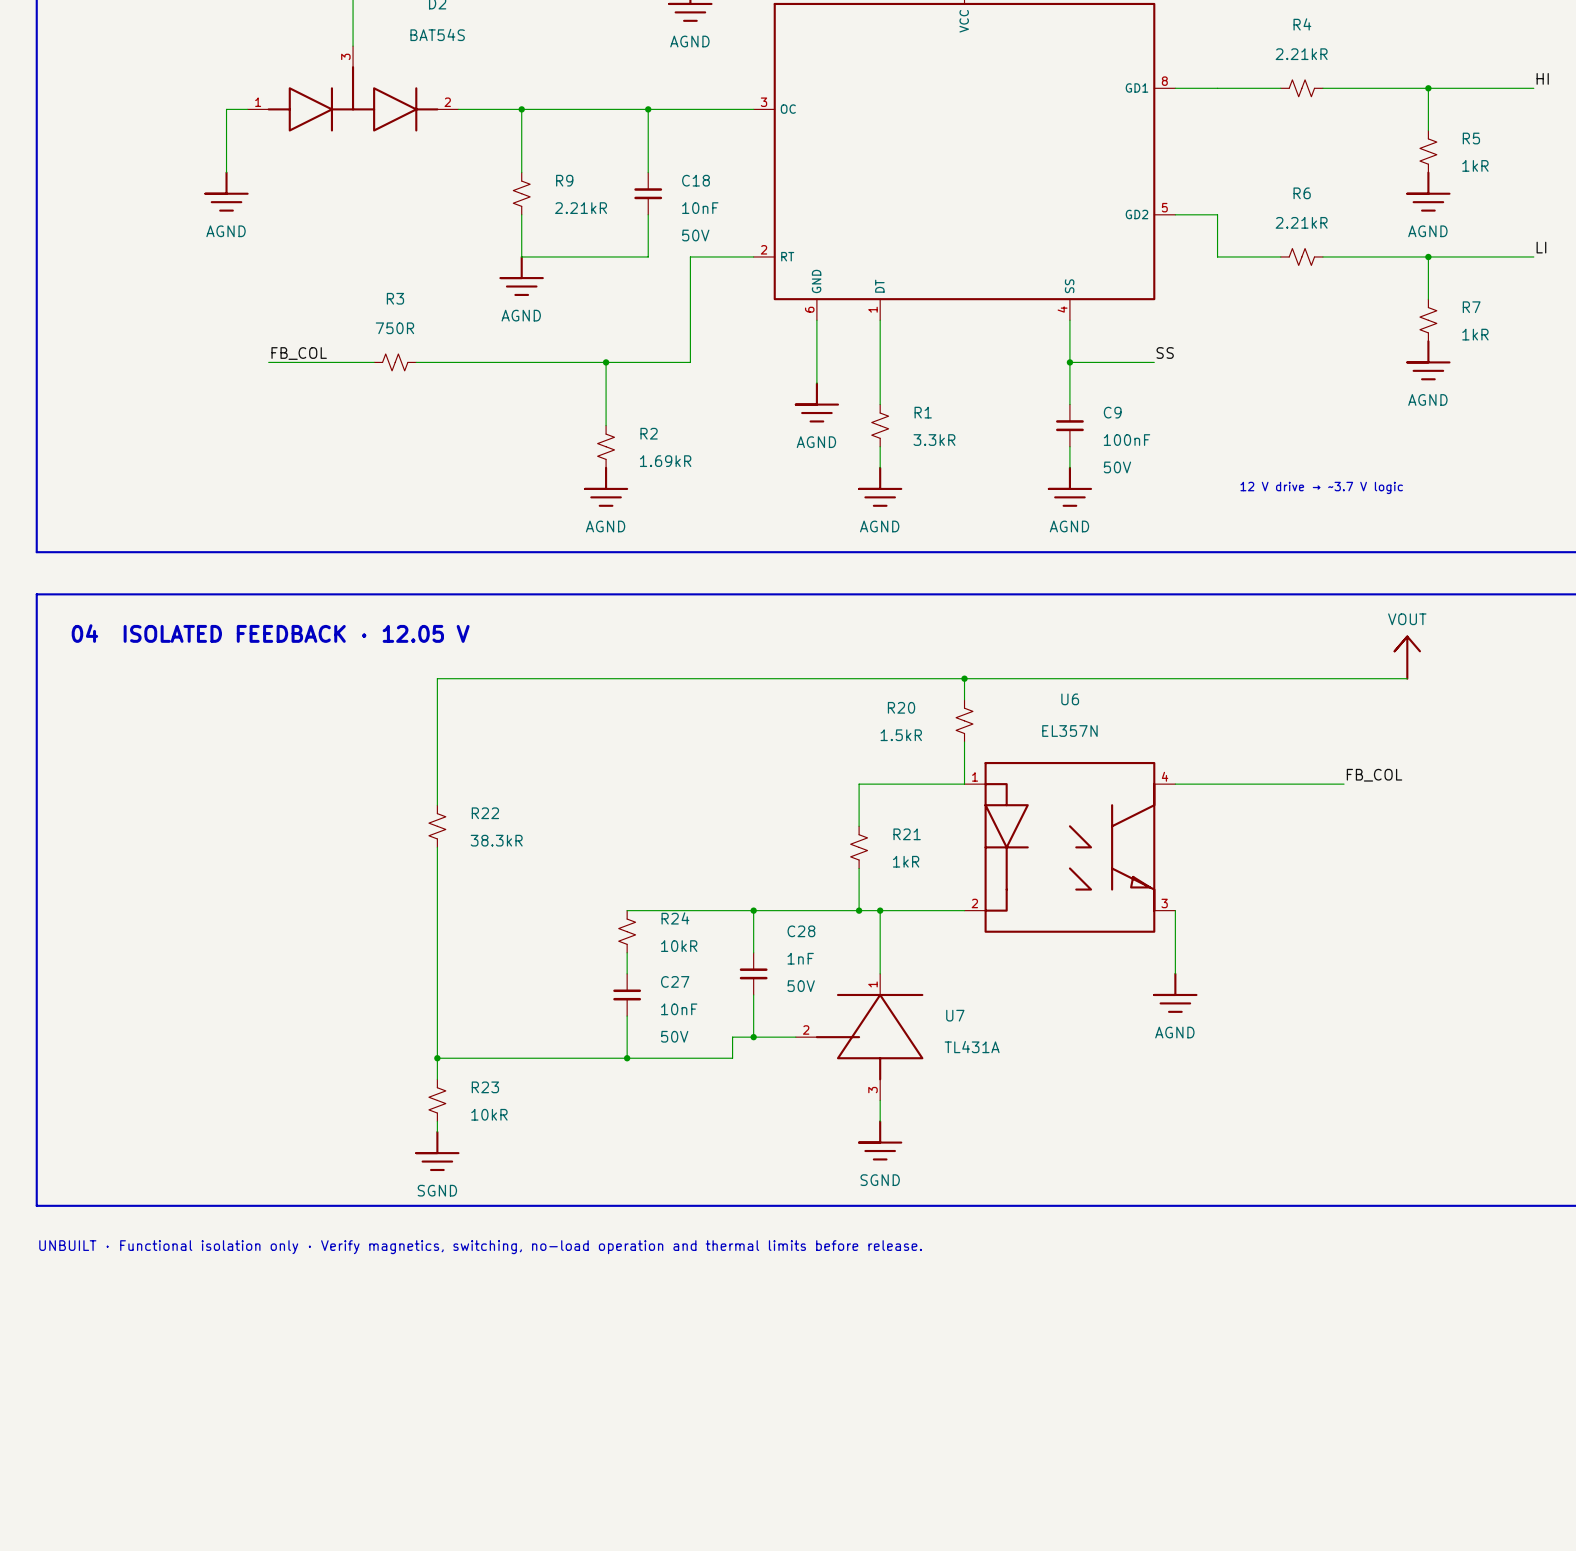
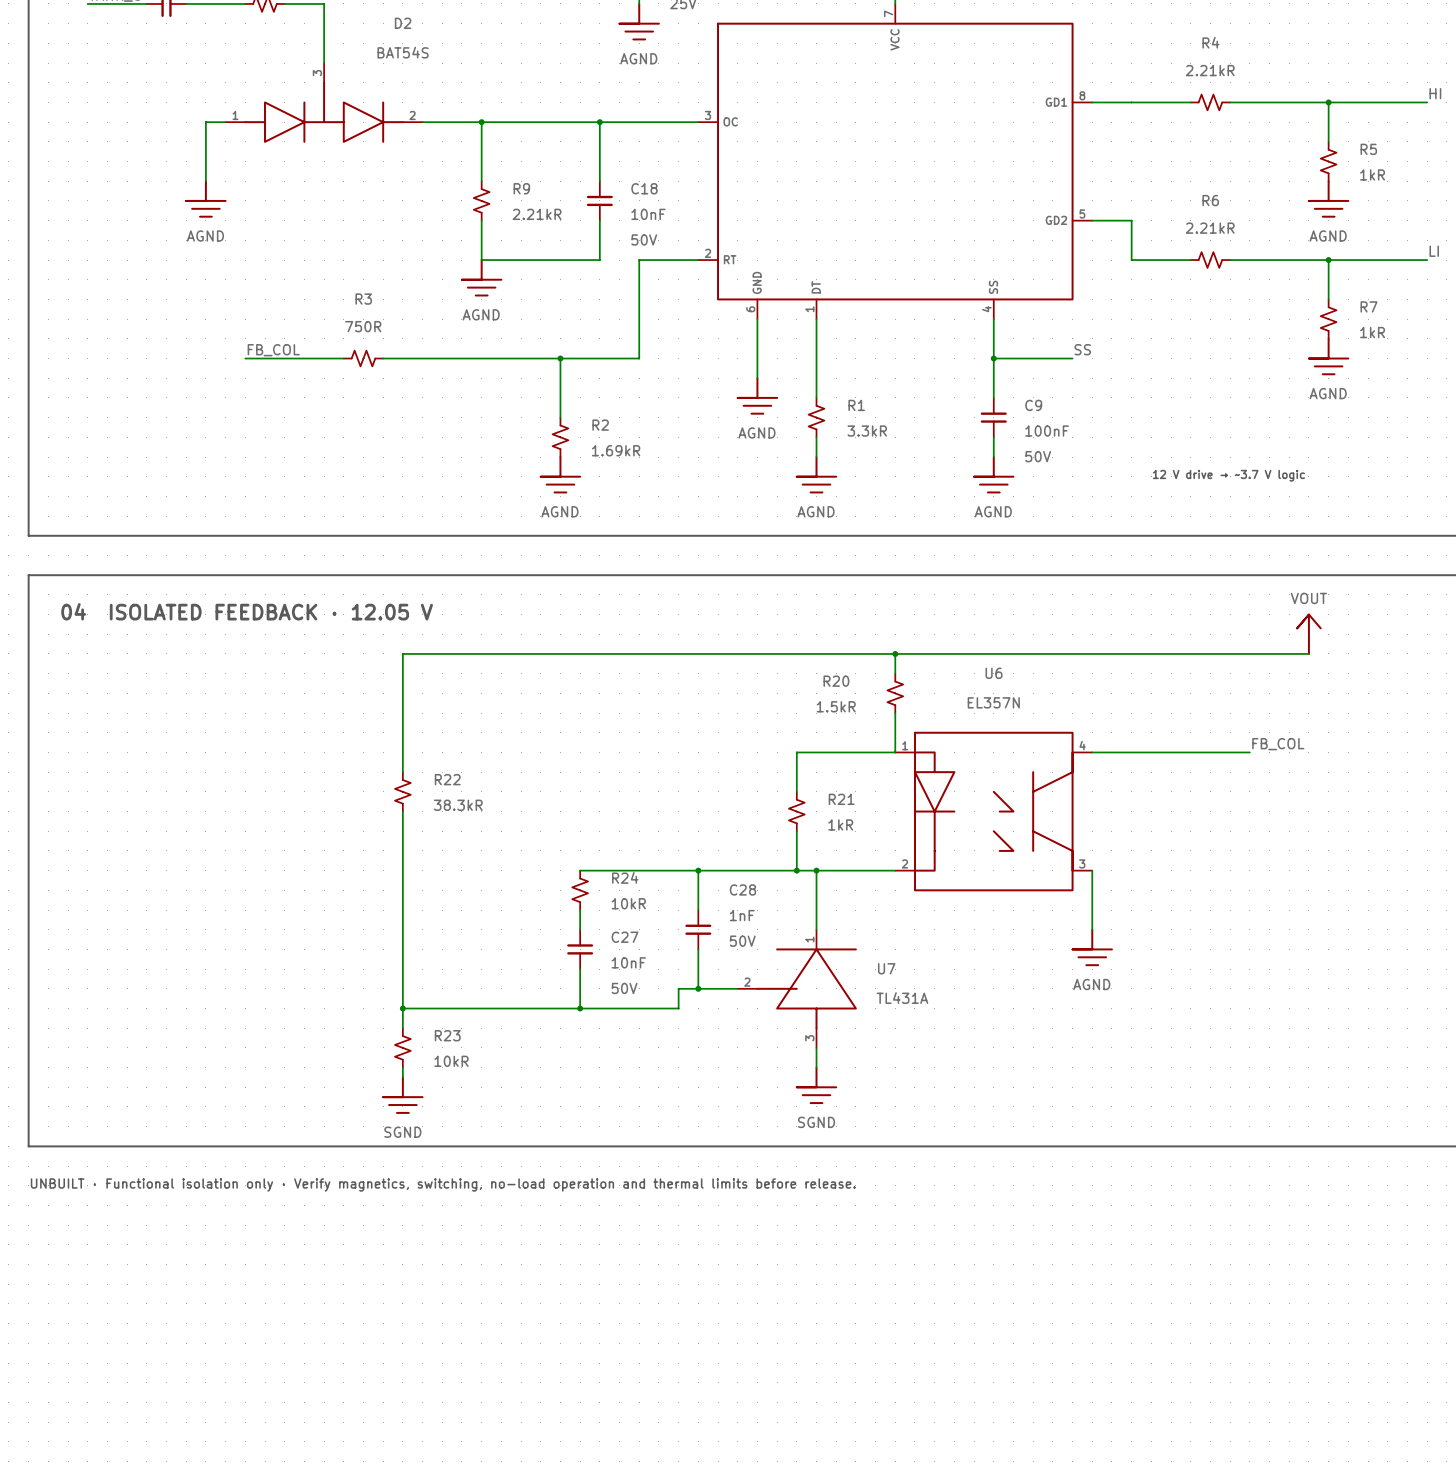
U6 symbol: [964, 761, 1176, 933] -> [895, 731, 1093, 892]

